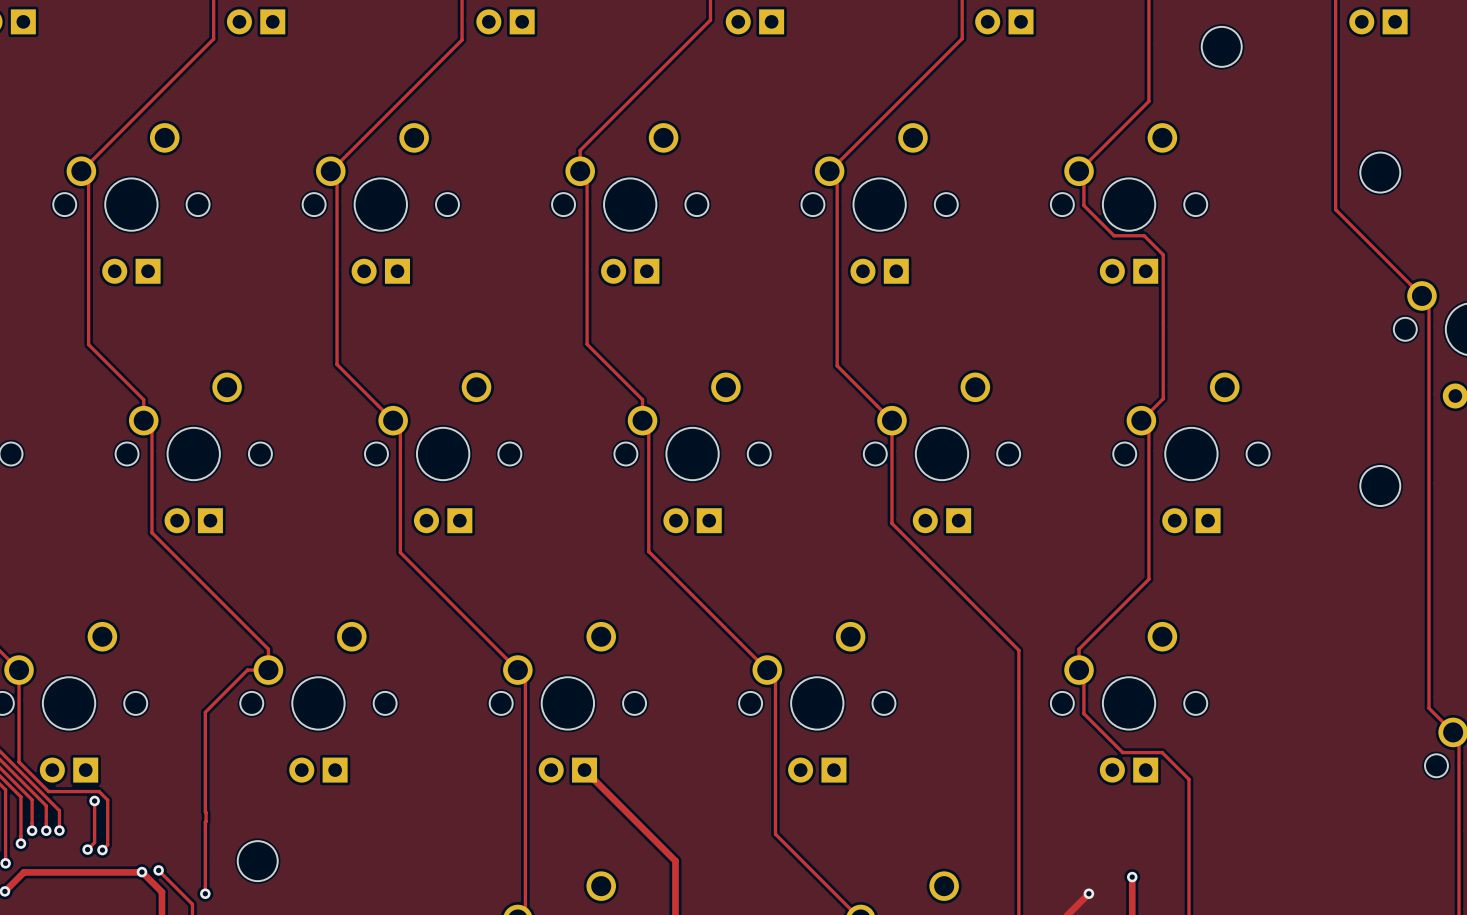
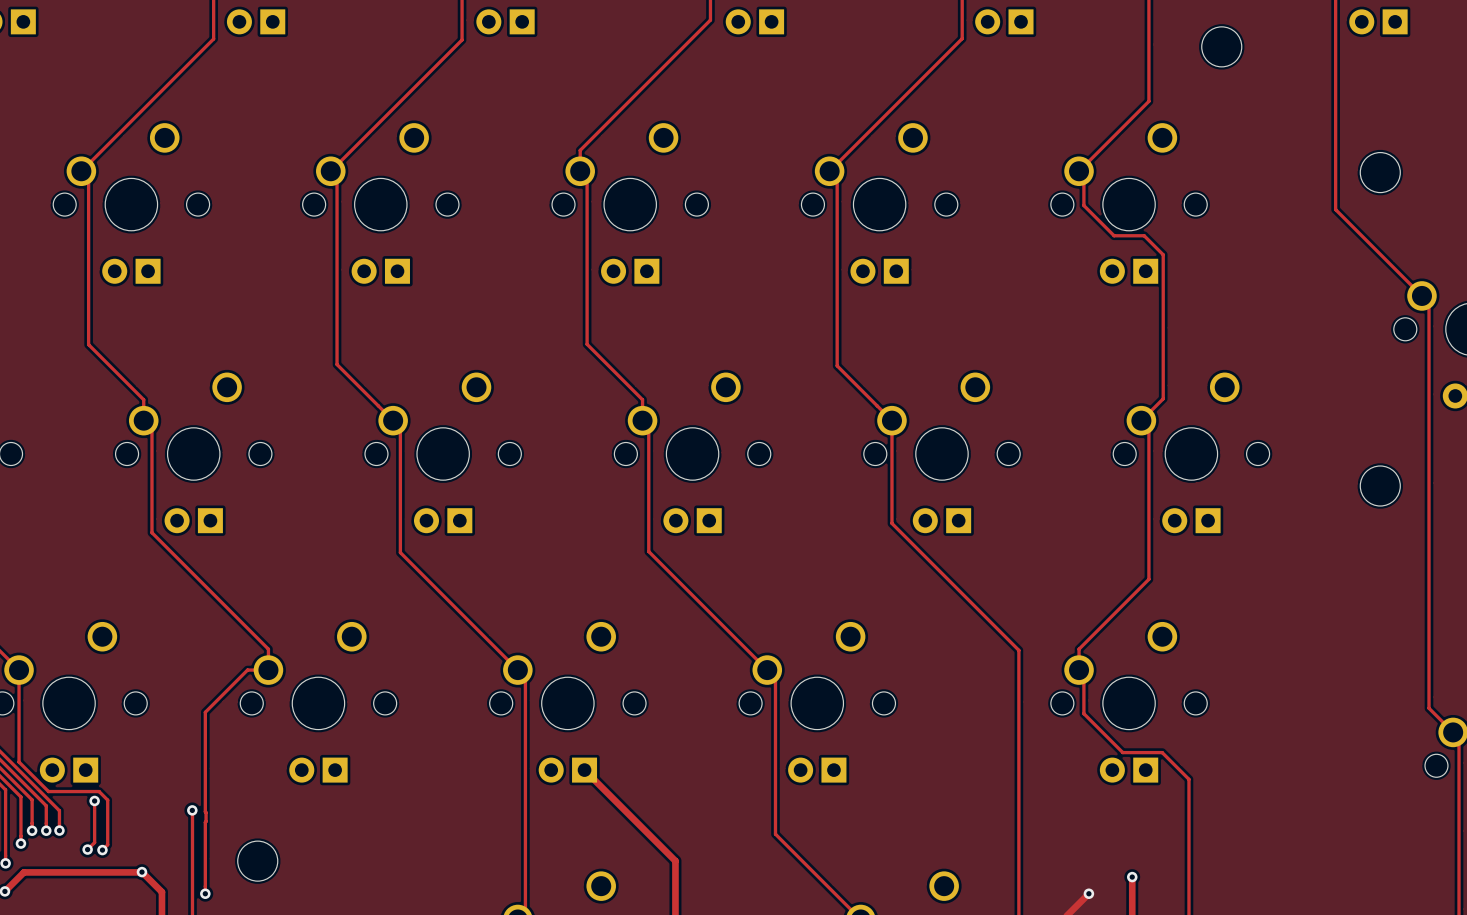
track: (158, 870) (192, 904) -> (192, 810) (192, 904)
via position: (158, 870) -> (192, 810)

